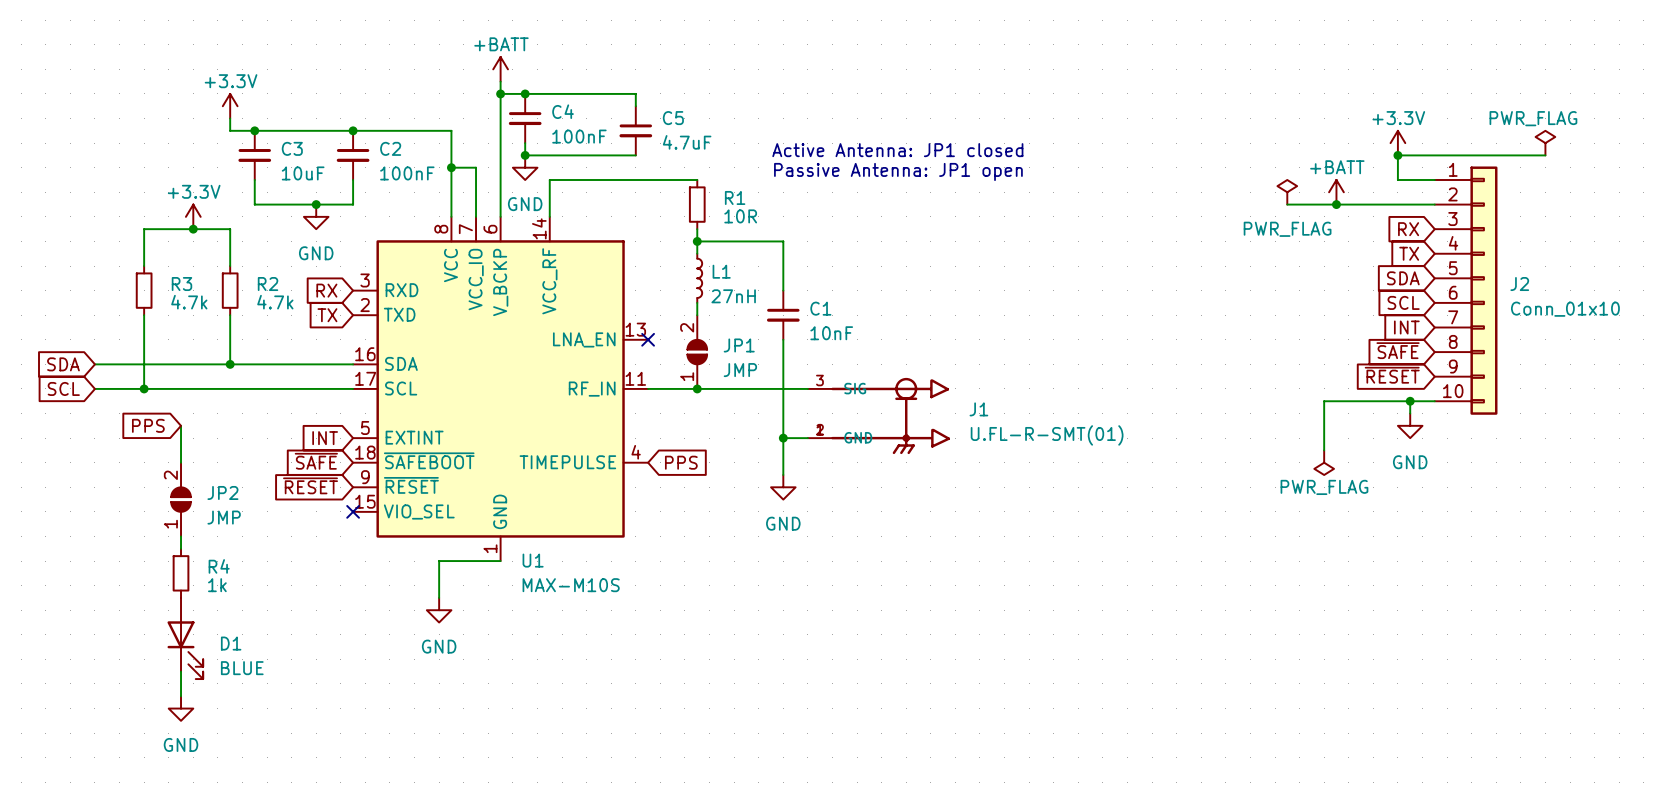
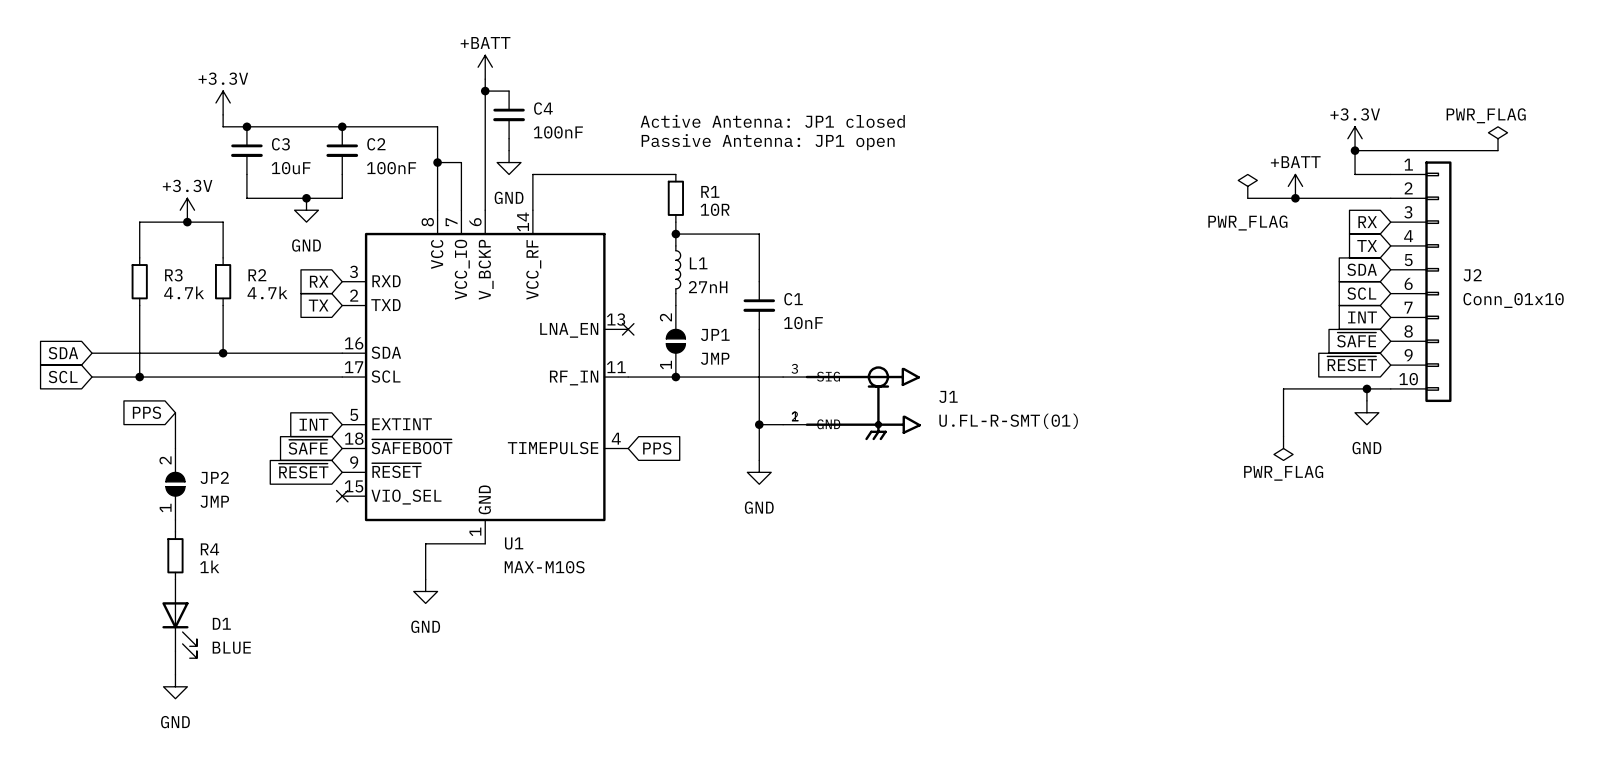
wire: (525, 93) (635, 93) (635, 106) -> none
junction: (525, 93) -> none
C5: 4.7uF (635, 130) -> none
text position: Active Antenna: JP1 closed (897, 150) -> Active Antenna: JP1 closed (772, 121)
wire: (525, 155) (635, 155) -> none
junction: (525, 155) -> none
text position: Passive Antenna: JP1 open (898, 171) -> Passive Antenna: JP1 open (768, 142)

